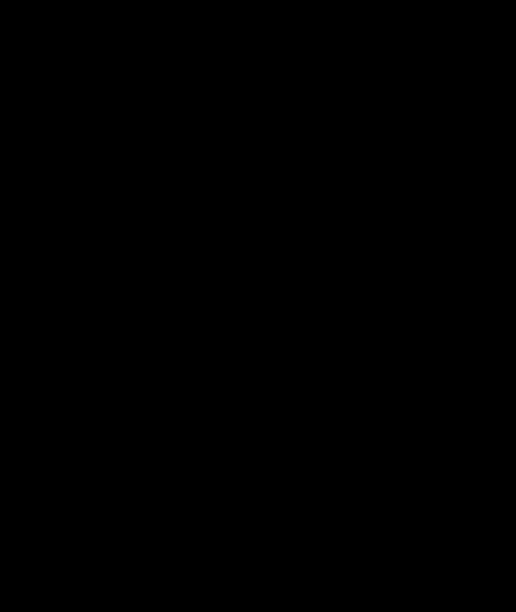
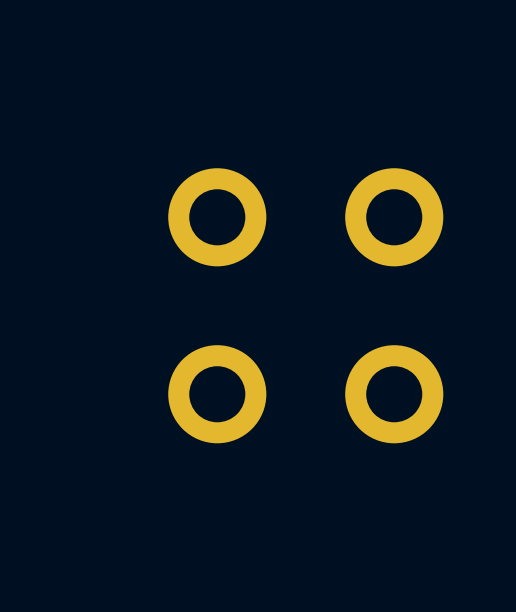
part: none -> (217, 217)
part: none -> (394, 217)
part: none -> (217, 394)
part: none -> (394, 394)

